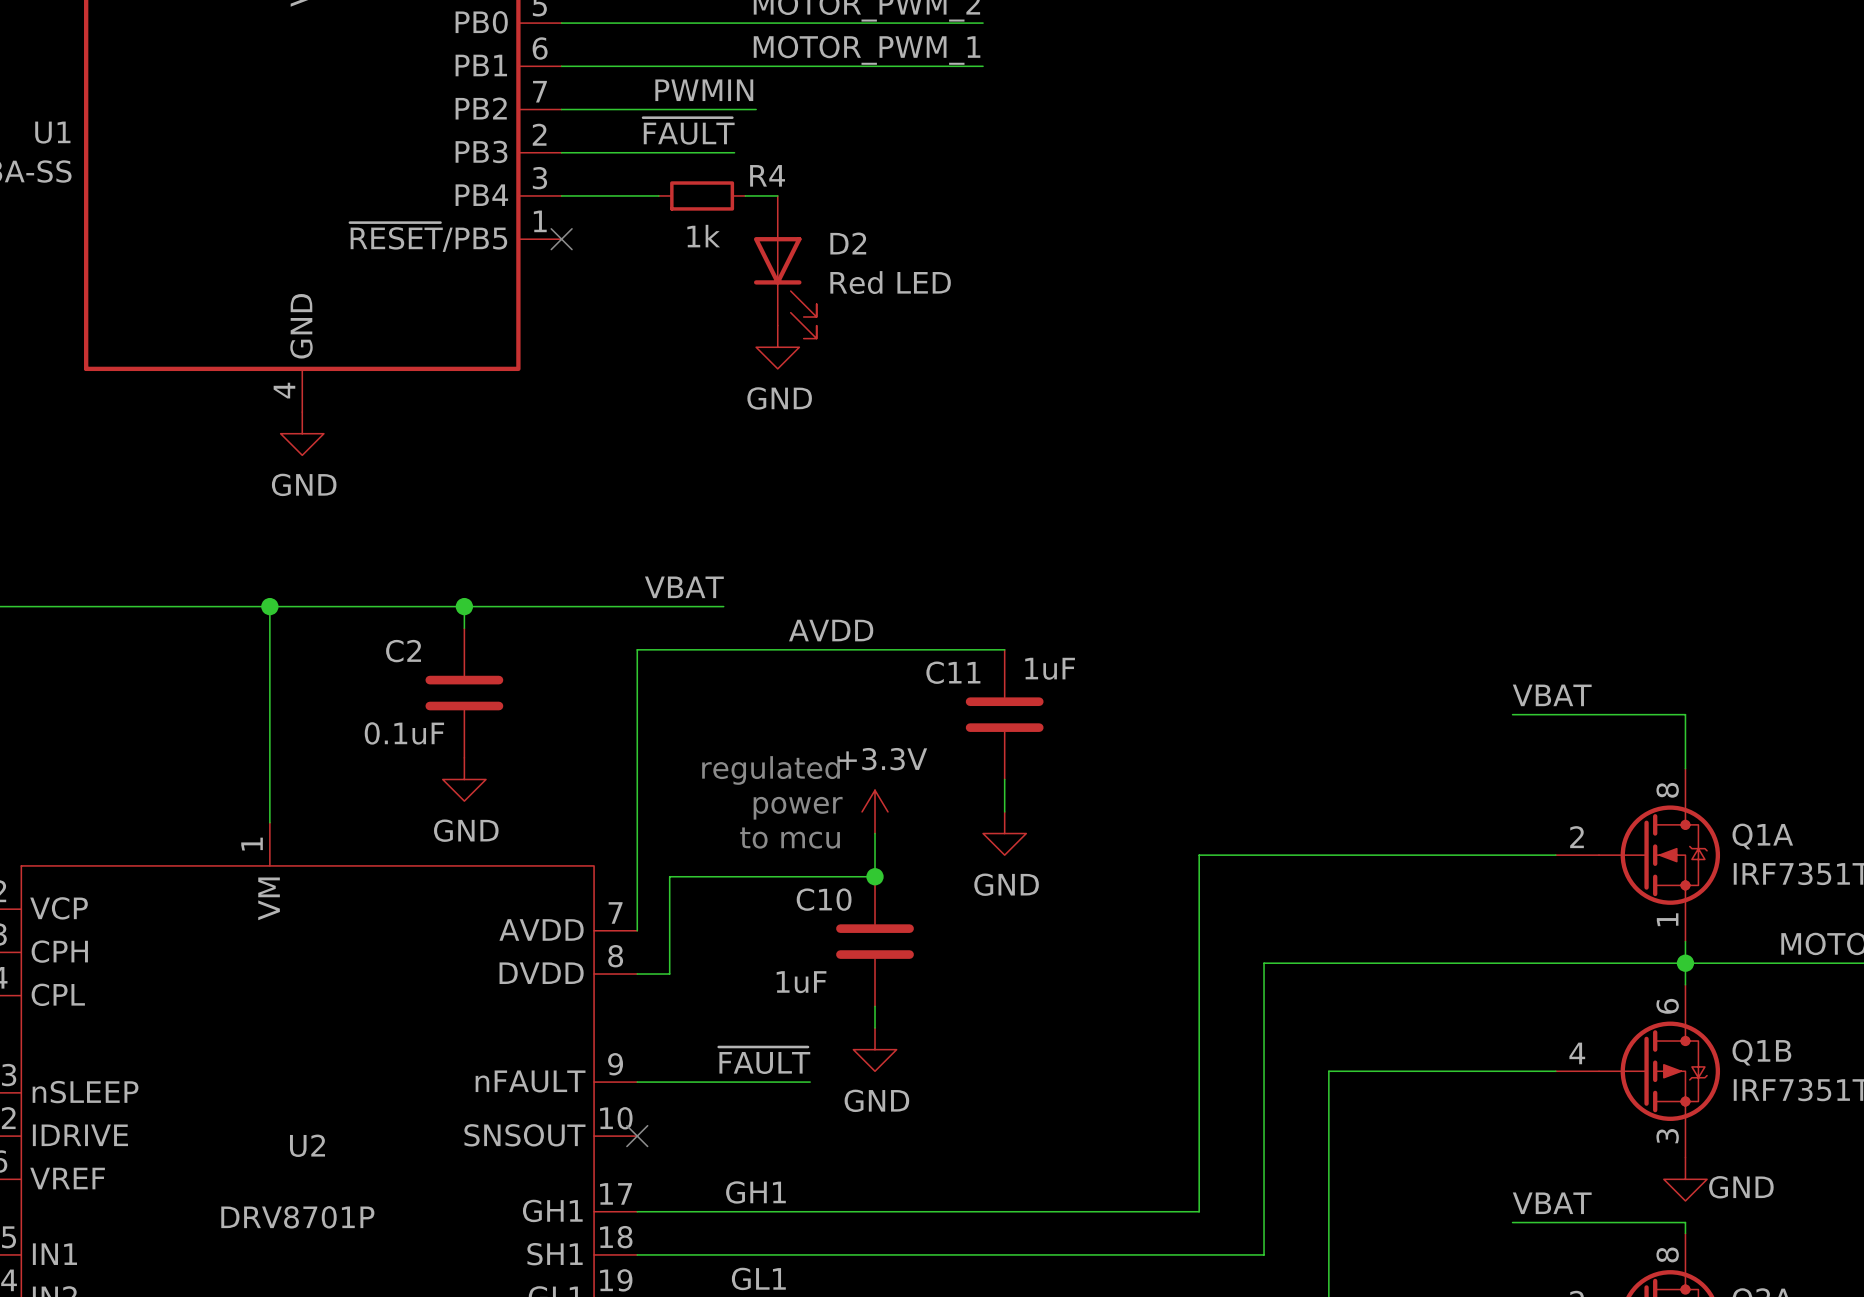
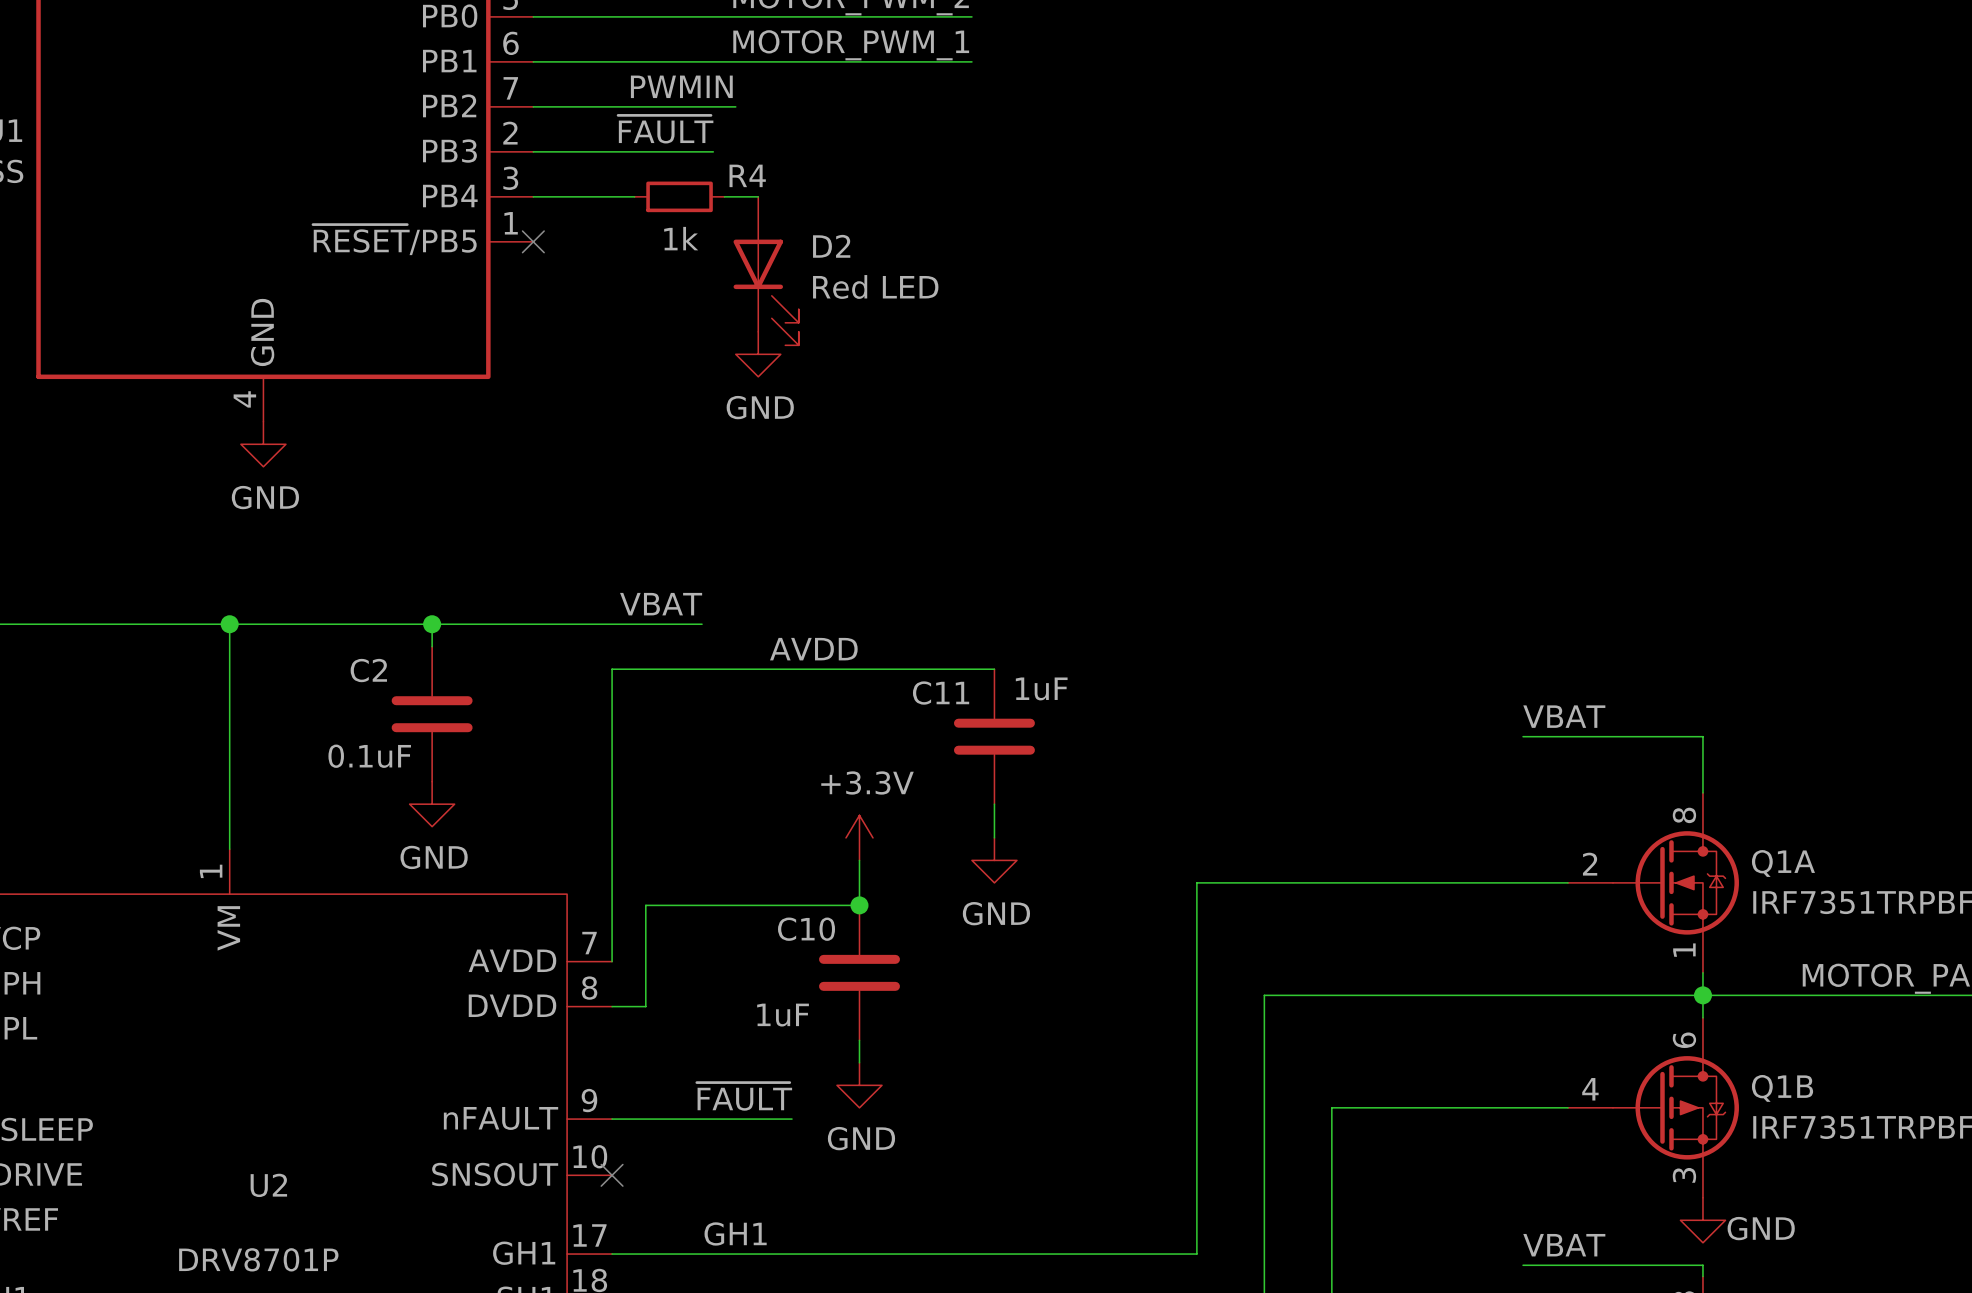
text: regulated (771, 770) -> none
text: power (798, 808) -> none
text: to mcu (790, 838) -> none

